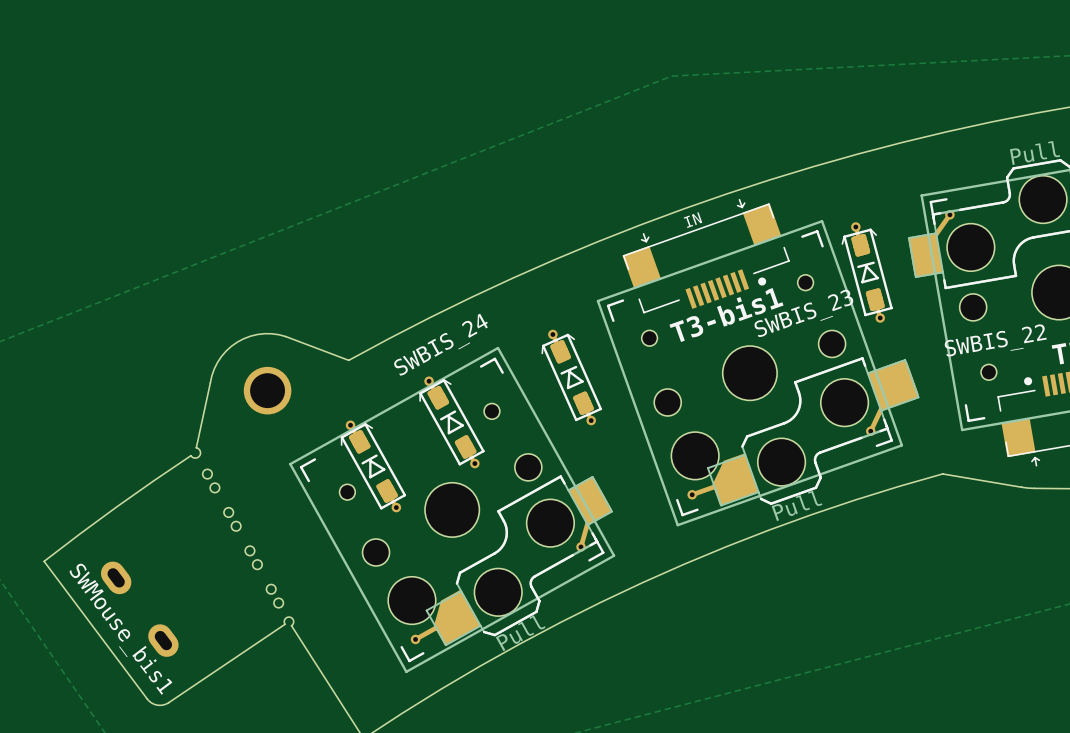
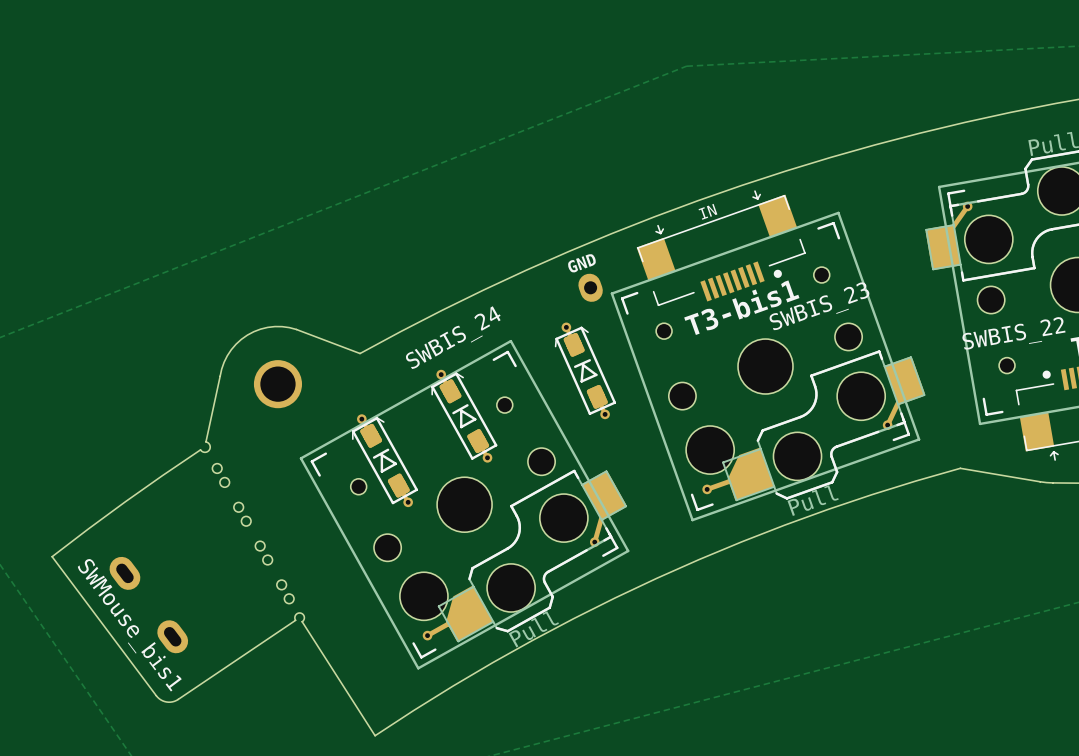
SWBIS_23 footprint: [596, 220, 920, 527] -> [610, 211, 926, 522]
part: (867, 272) -> none
part: none -> (590, 287)

